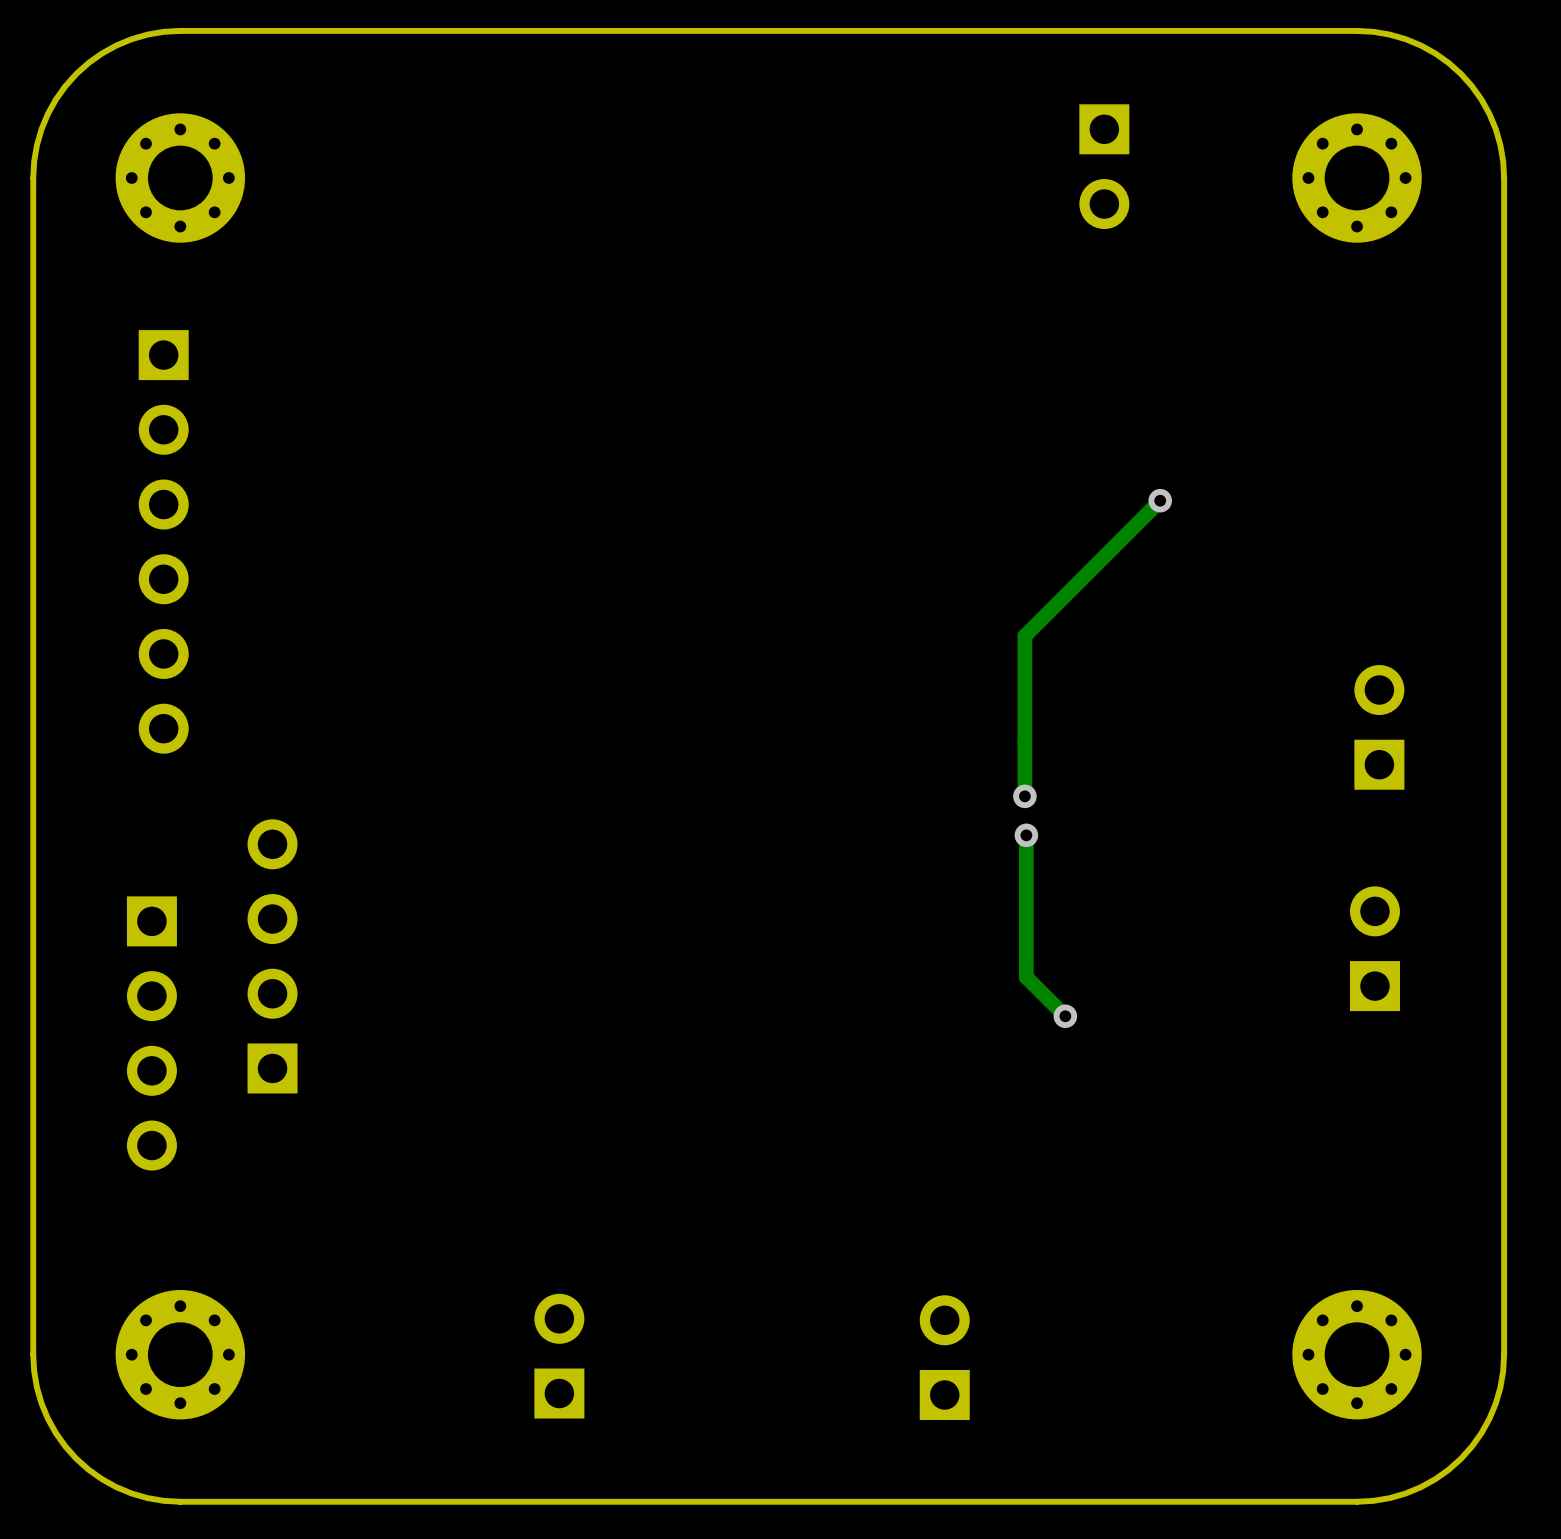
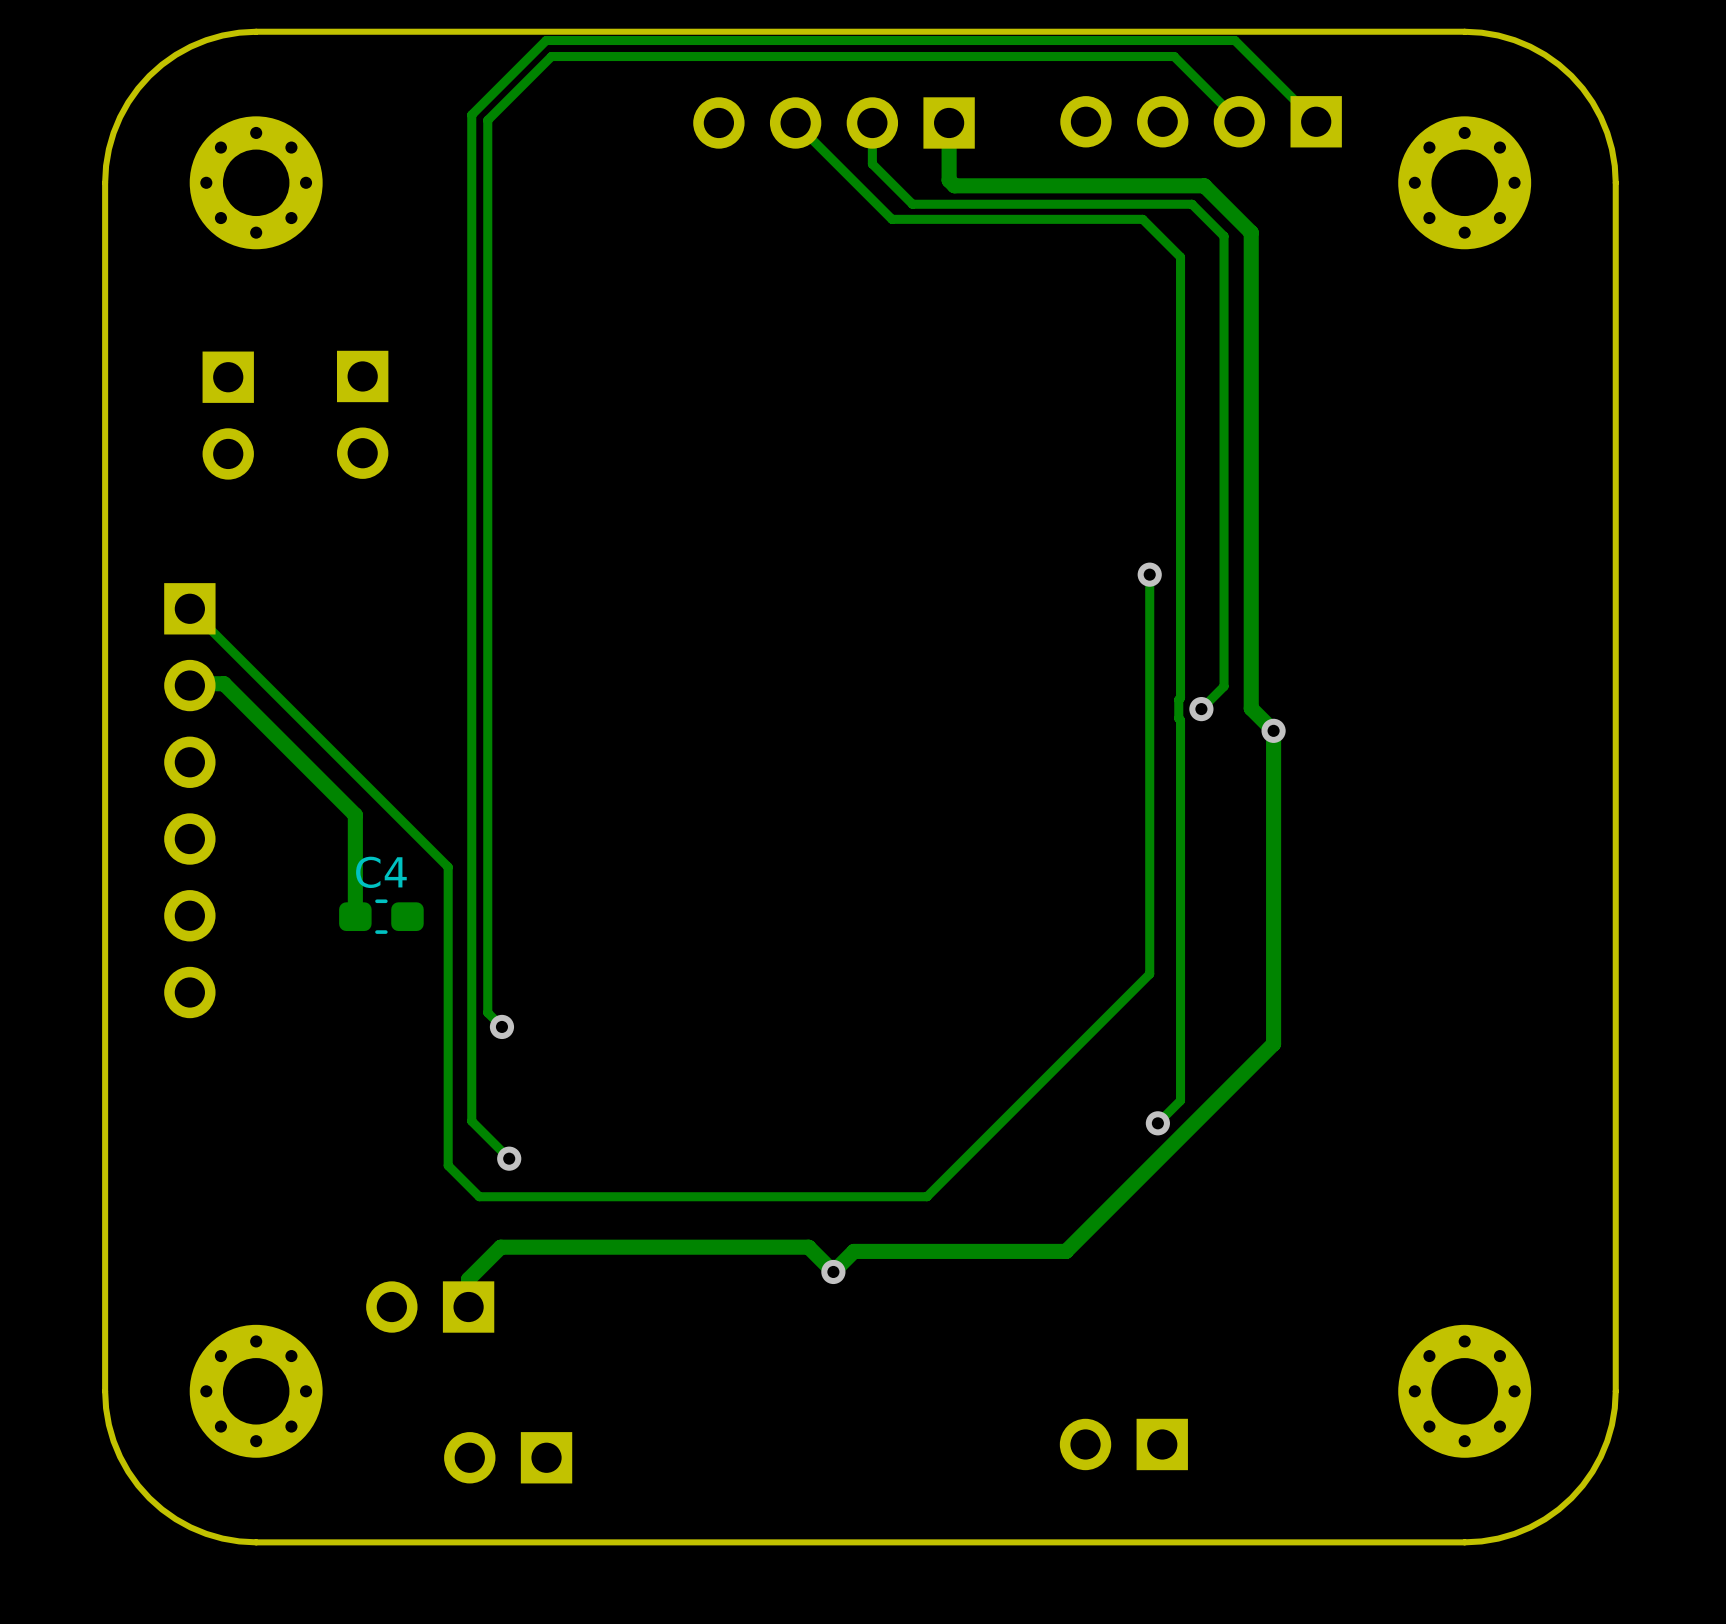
part: none -> (1201, 121)
track: none -> (1239, 121) (1174, 56) (551, 56) (487, 120) (487, 1012) (501, 1026)
track: none -> (1316, 121) (1234, 40) (546, 40) (471, 114) (471, 1121) (509, 1158)
track: none -> (795, 122) (891, 219) (1142, 219) (1180, 257) (1180, 697) (1178, 699) (1178, 718) (1180, 720) (1180, 1100) (1157, 1123)
part: none -> (834, 122)
track: none -> (872, 122) (872, 164) (912, 204) (1192, 204) (1224, 236) (1224, 686) (1201, 709)
track: none -> (949, 122) (949, 180) (954, 185) (1204, 185) (1251, 232) (1251, 708) (1273, 730) (1273, 1043) (1066, 1251) (853, 1251) (833, 1271) (808, 1247) (500, 1247) (468, 1279) (468, 1307)
part: (1104, 166) -> none
part: none -> (362, 414)
part: none -> (228, 415)
track: (1160, 500) (1024, 636) (1024, 796) -> none
via: (1160, 500) -> none
part position: (163, 541) -> (189, 800)
track: none -> (1149, 574) (1149, 974) (927, 1196) (479, 1196) (448, 1165) (448, 867) (189, 608)
via: none -> (1149, 574)
track: none -> (199, 683) (224, 683) (355, 815) (355, 916)
via: none -> (1201, 709)
via: none -> (1273, 730)
part: (1379, 727) -> none
via: (1024, 796) -> none
track: (1026, 835) (1026, 977) (1065, 1016) -> none
via: (1026, 835) -> none
C4: none -> (381, 916)
part: (1374, 948) -> none
part: (272, 956) -> none
via: none -> (501, 1026)
via position: (1065, 1016) -> (1157, 1123)
part: (151, 1033) -> none
via: none -> (509, 1158)
via: none -> (833, 1271)
part: none -> (430, 1307)
part: (559, 1356) -> none
part rotation: 0° (944, 1357) -> 90° counterclockwise (1123, 1444)
part position: (944, 1357) -> (1123, 1444)
part: none -> (508, 1457)

